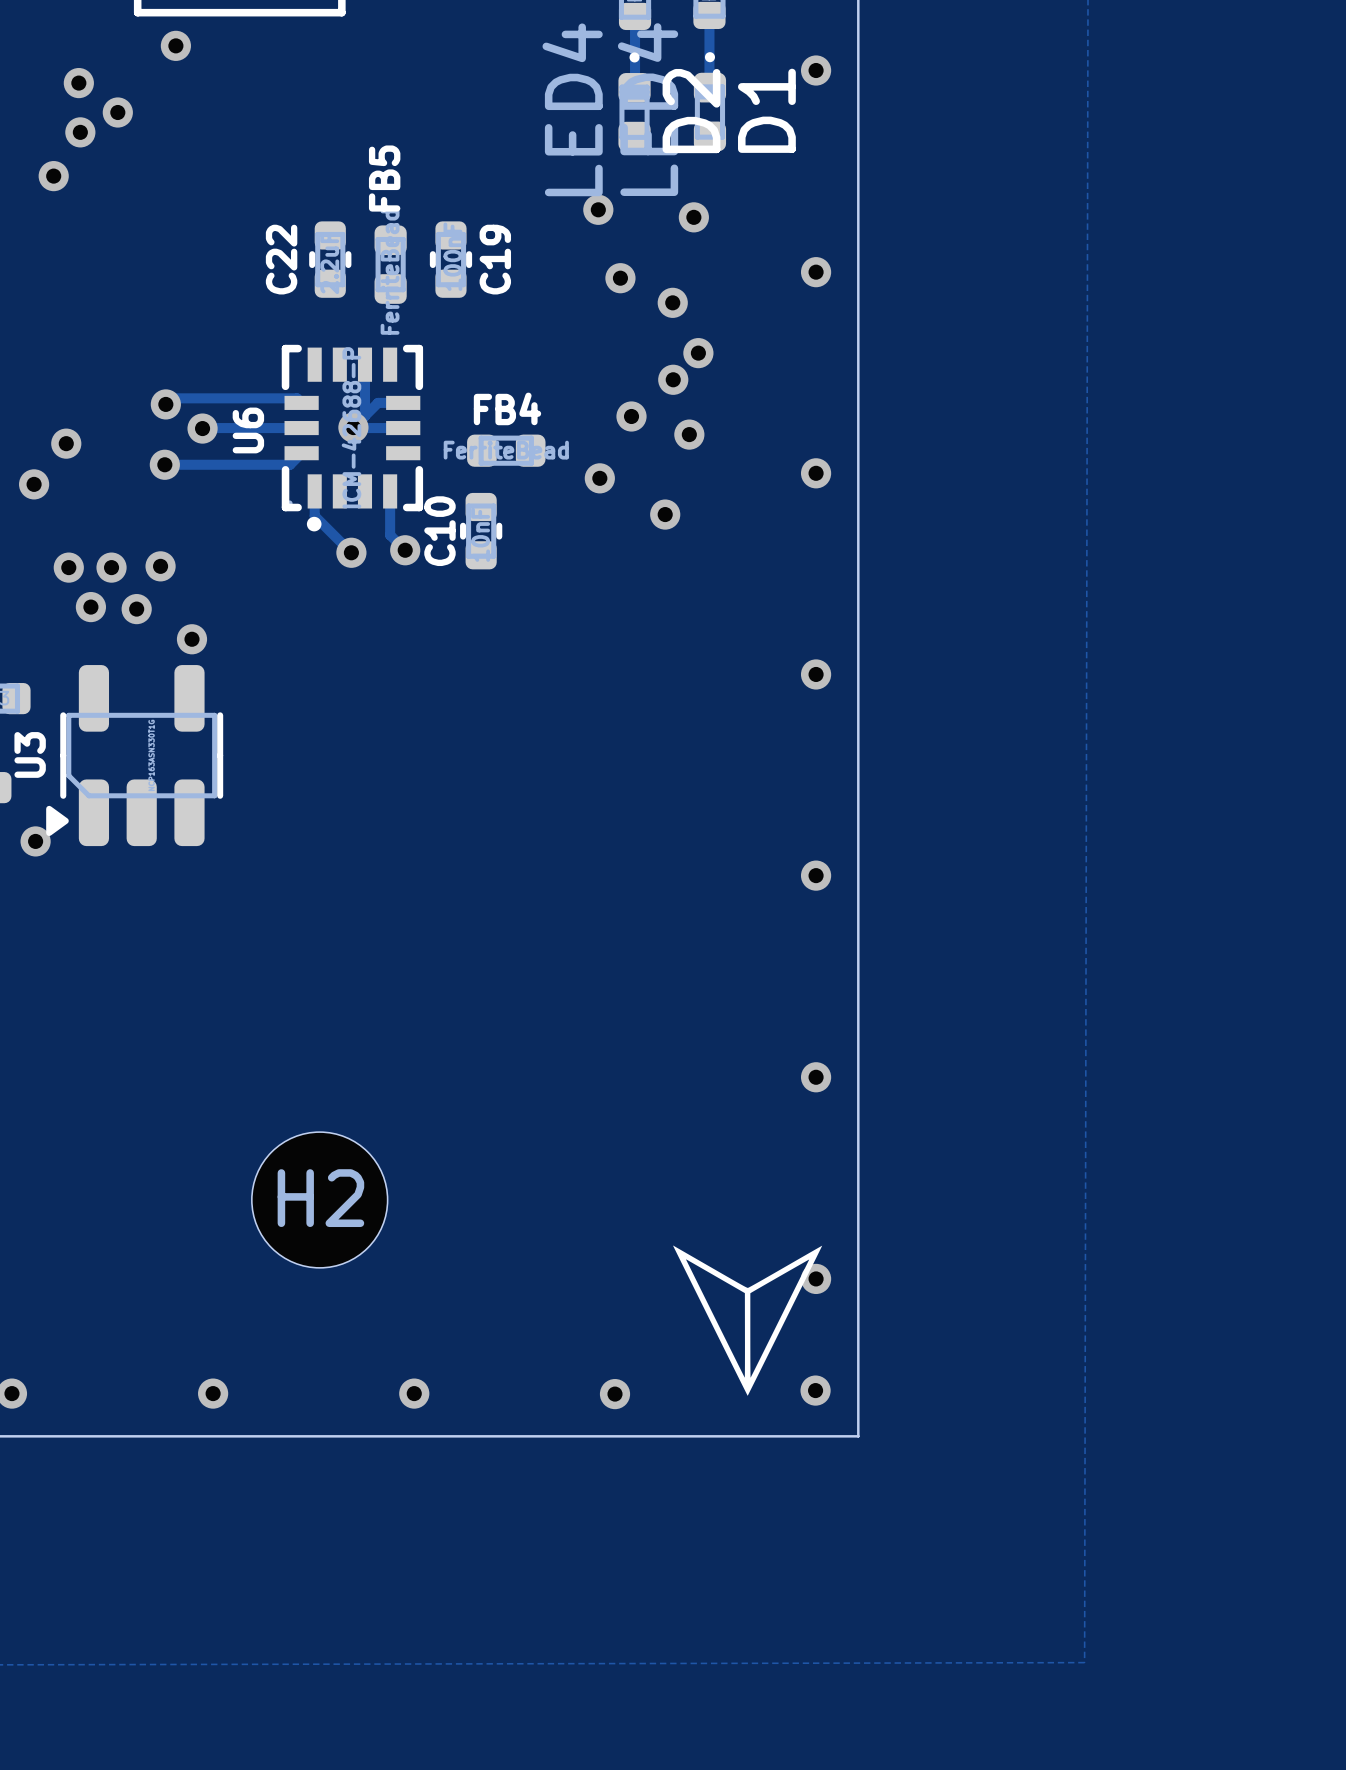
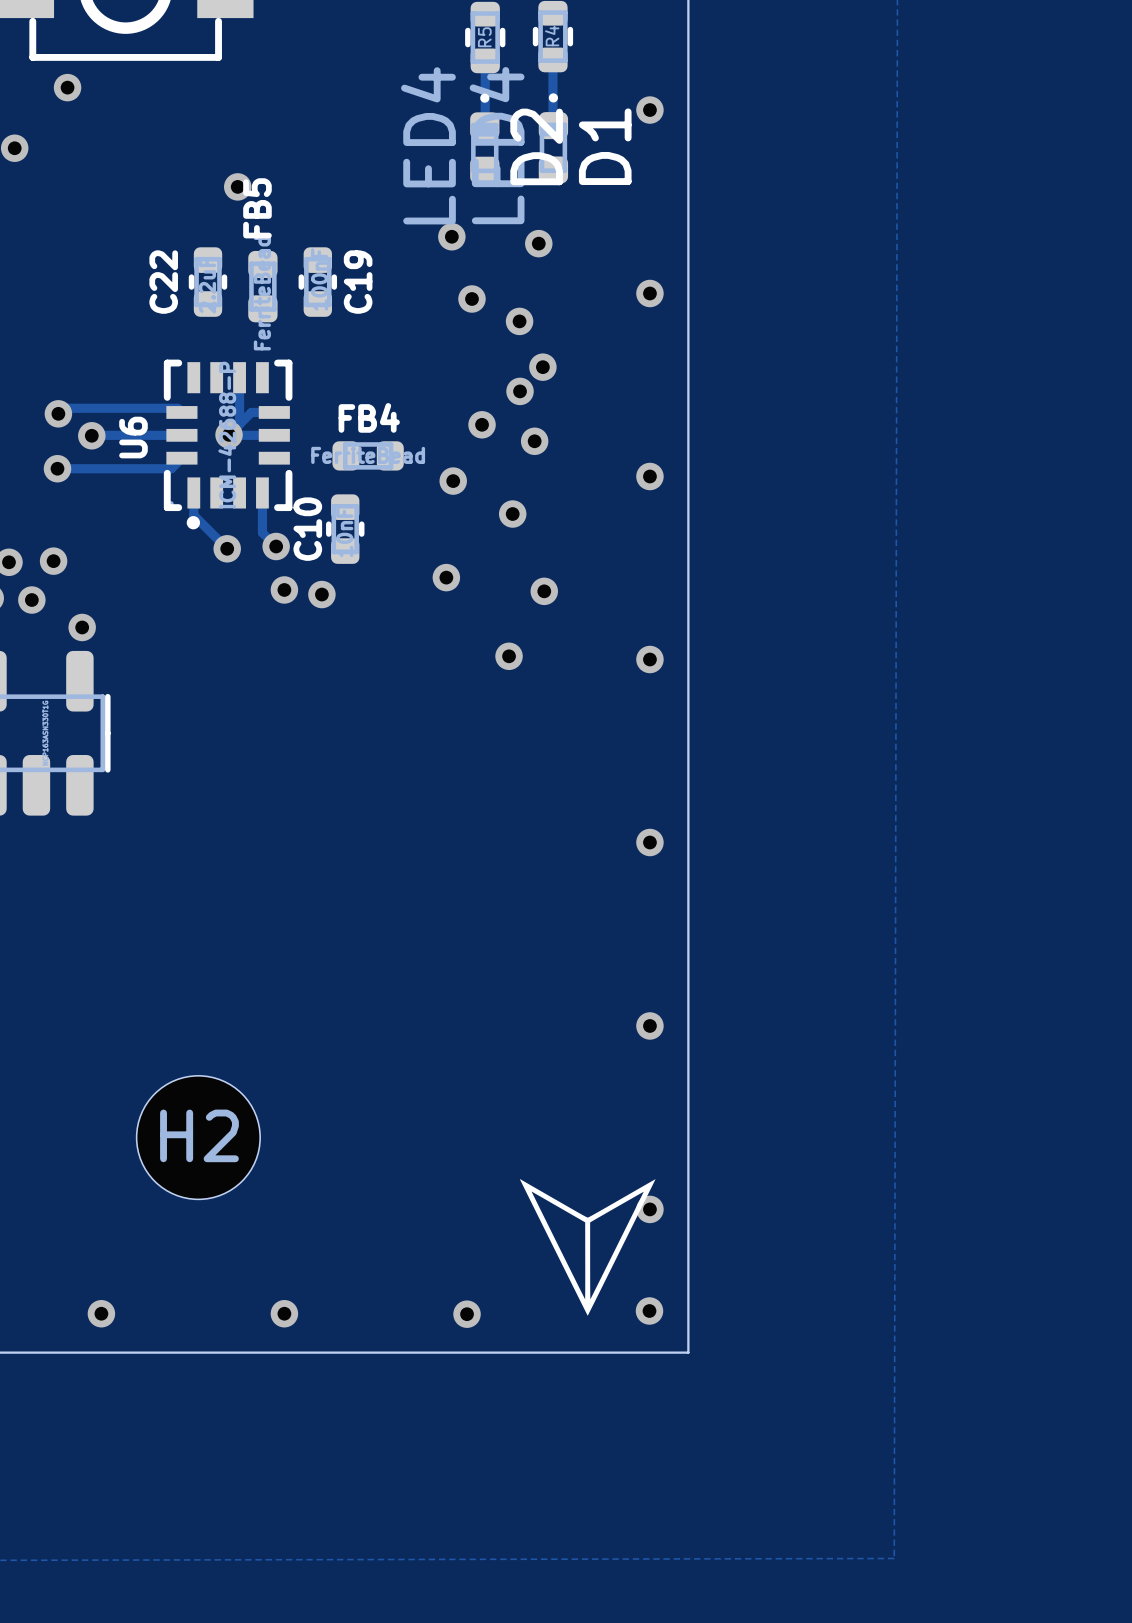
via: none -> (237, 186)
via: none -> (446, 577)
via: none -> (284, 589)
via: none -> (544, 591)
via: none -> (321, 594)
via: none -> (509, 656)

